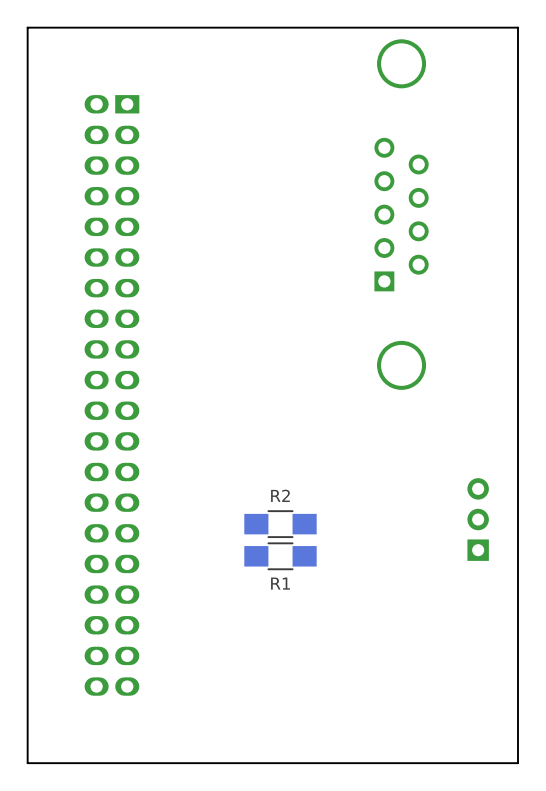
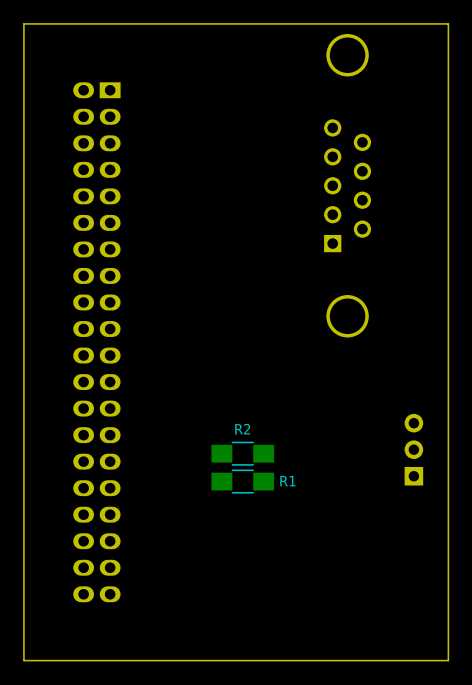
R1 name position: R1 (280, 583) -> R1 (287, 481)

